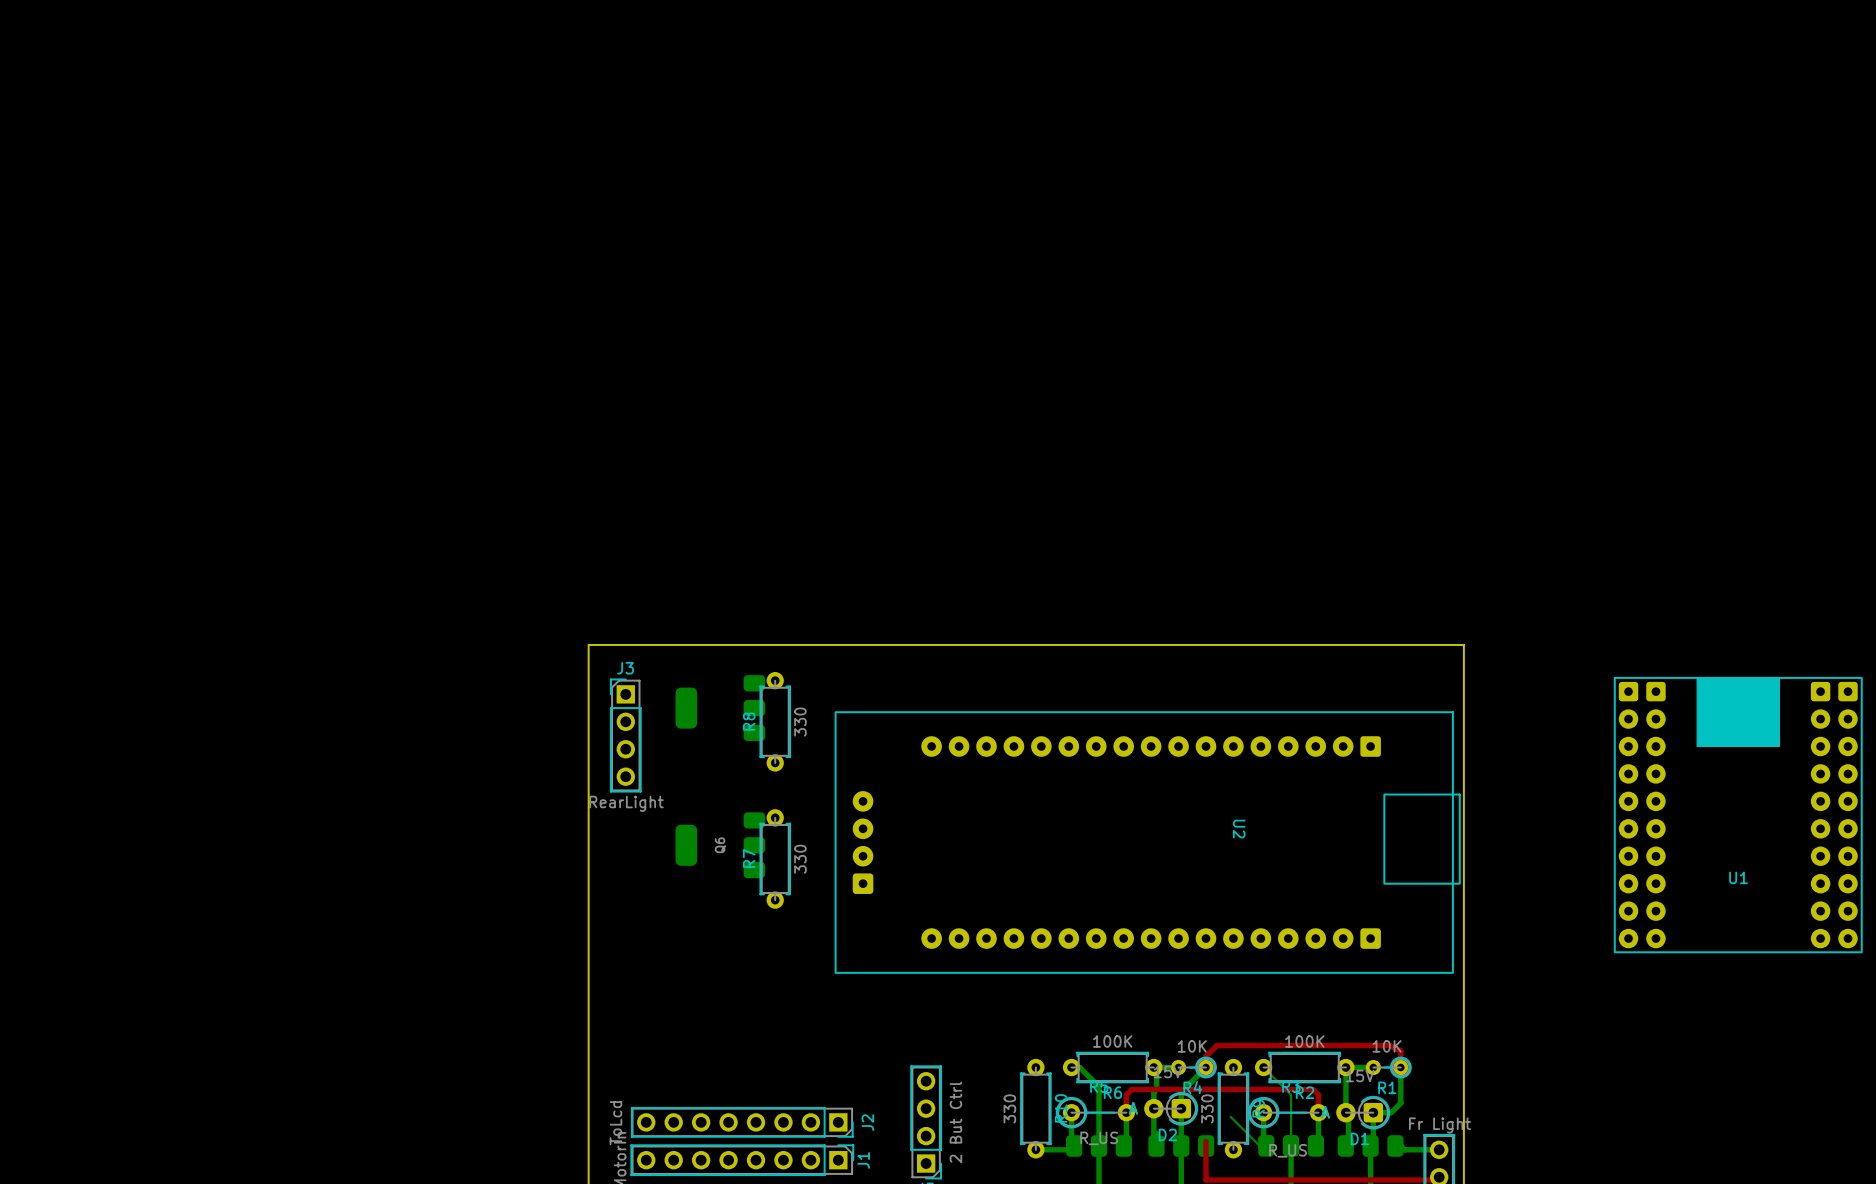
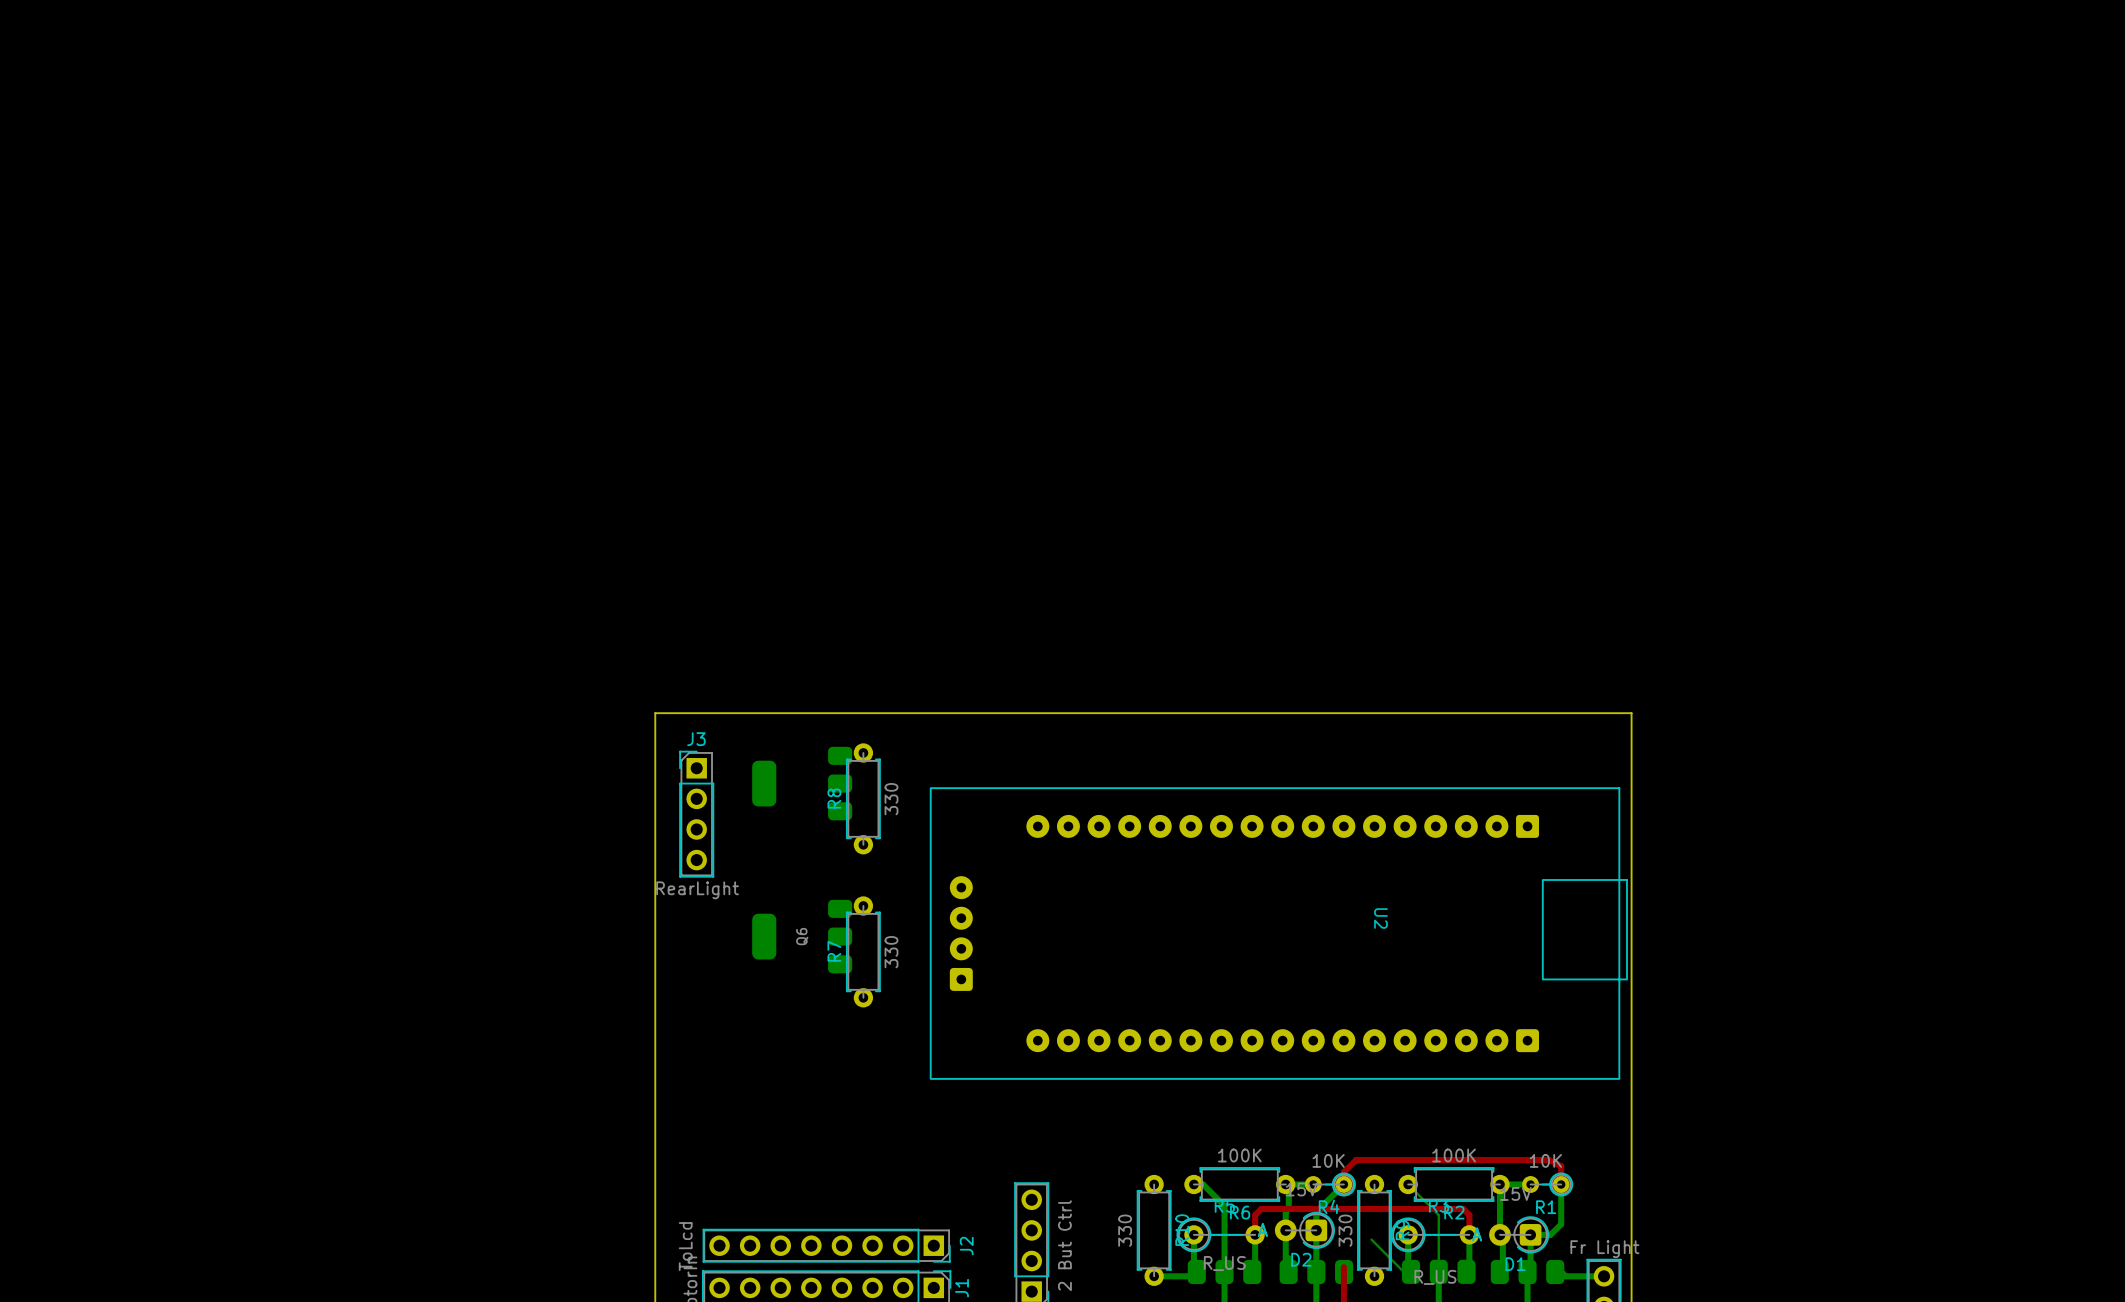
U1: (1738, 815) -> none

